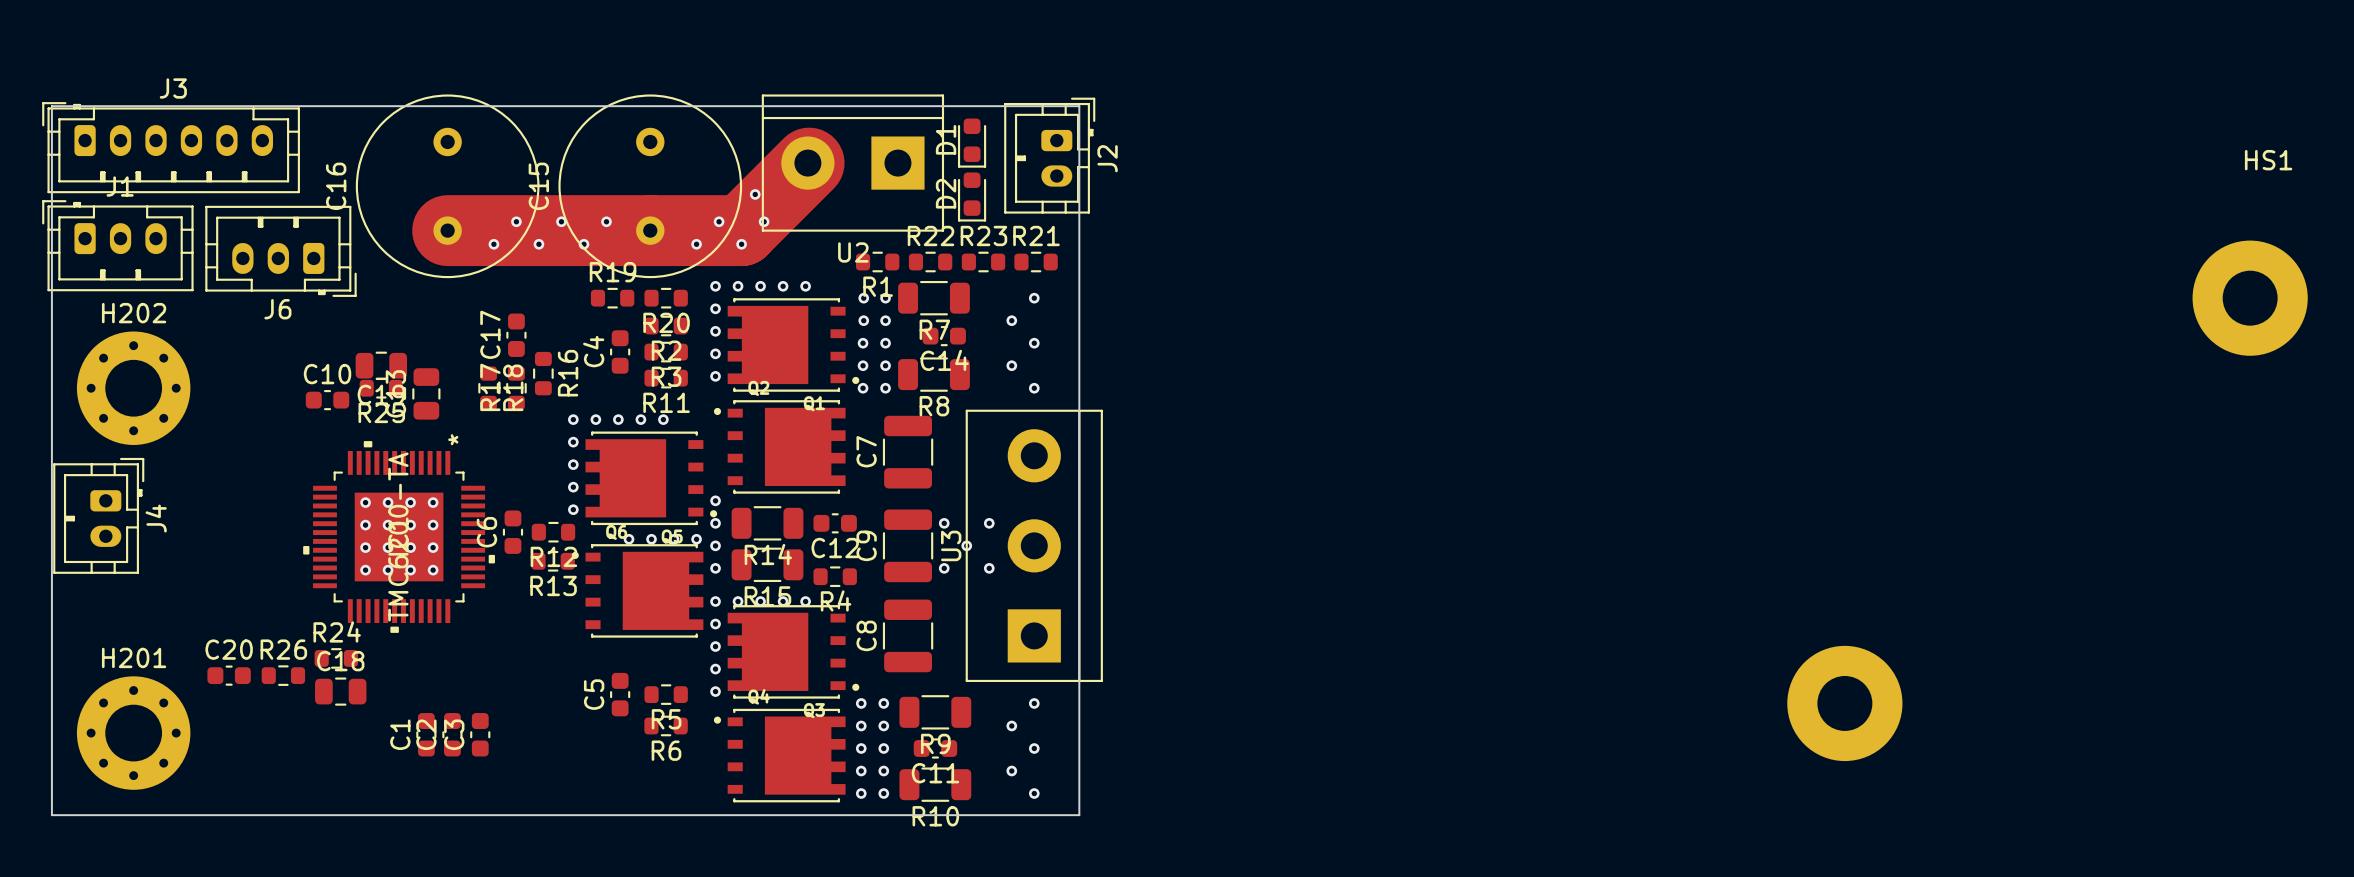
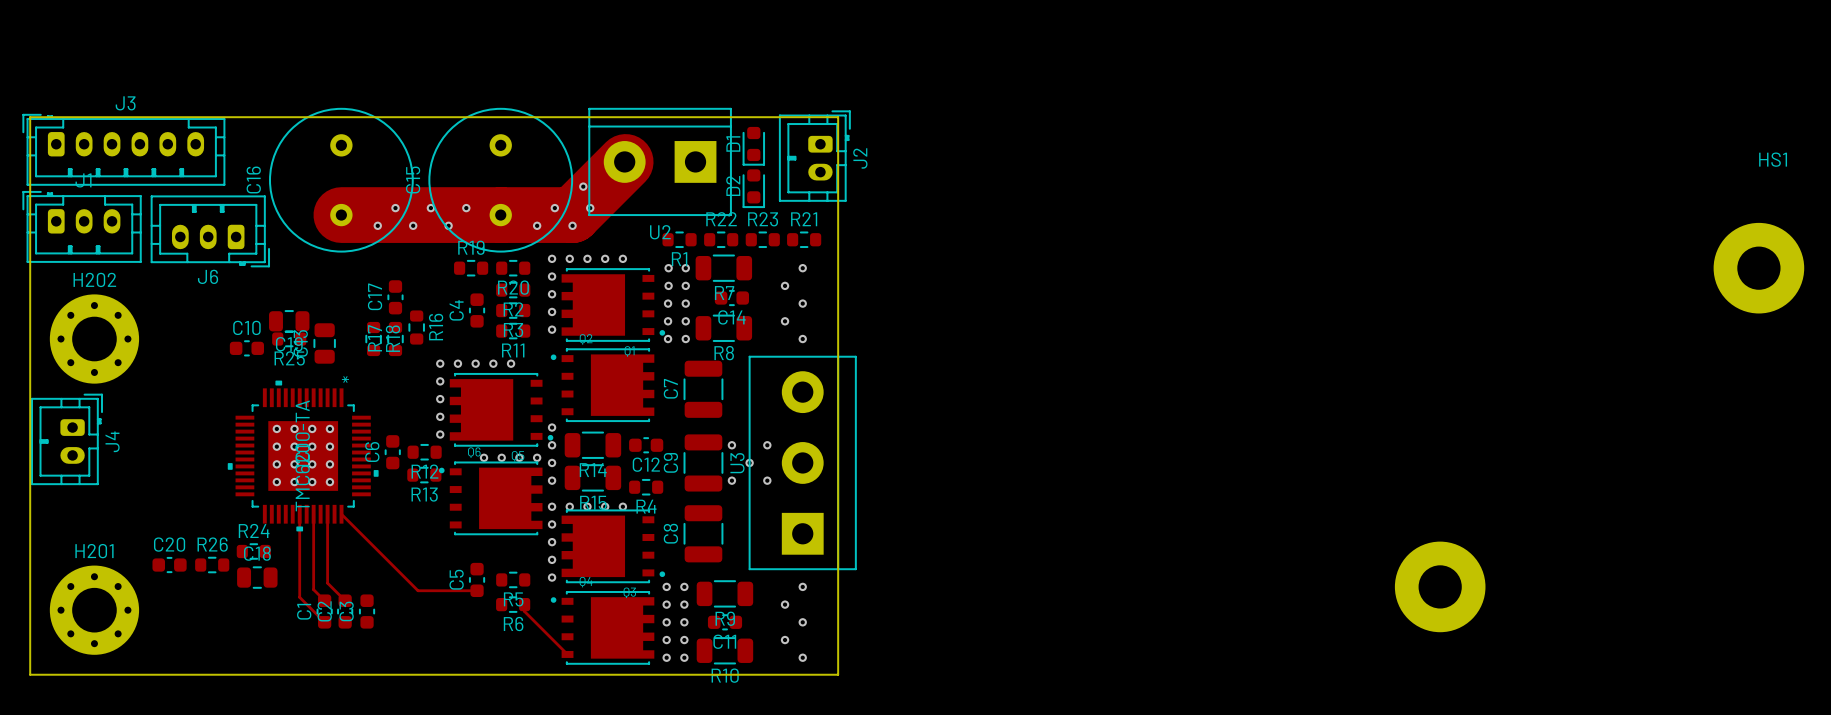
track: none -> (299, 514) (299, 597) (324, 622)
track: none -> (313, 514) (313, 589) (324, 600)
track: none -> (327, 514) (327, 583) (345, 600)
track: none -> (341, 514) (418, 590) (477, 590)
track: none -> (524, 604) (524, 611) (567, 654)

